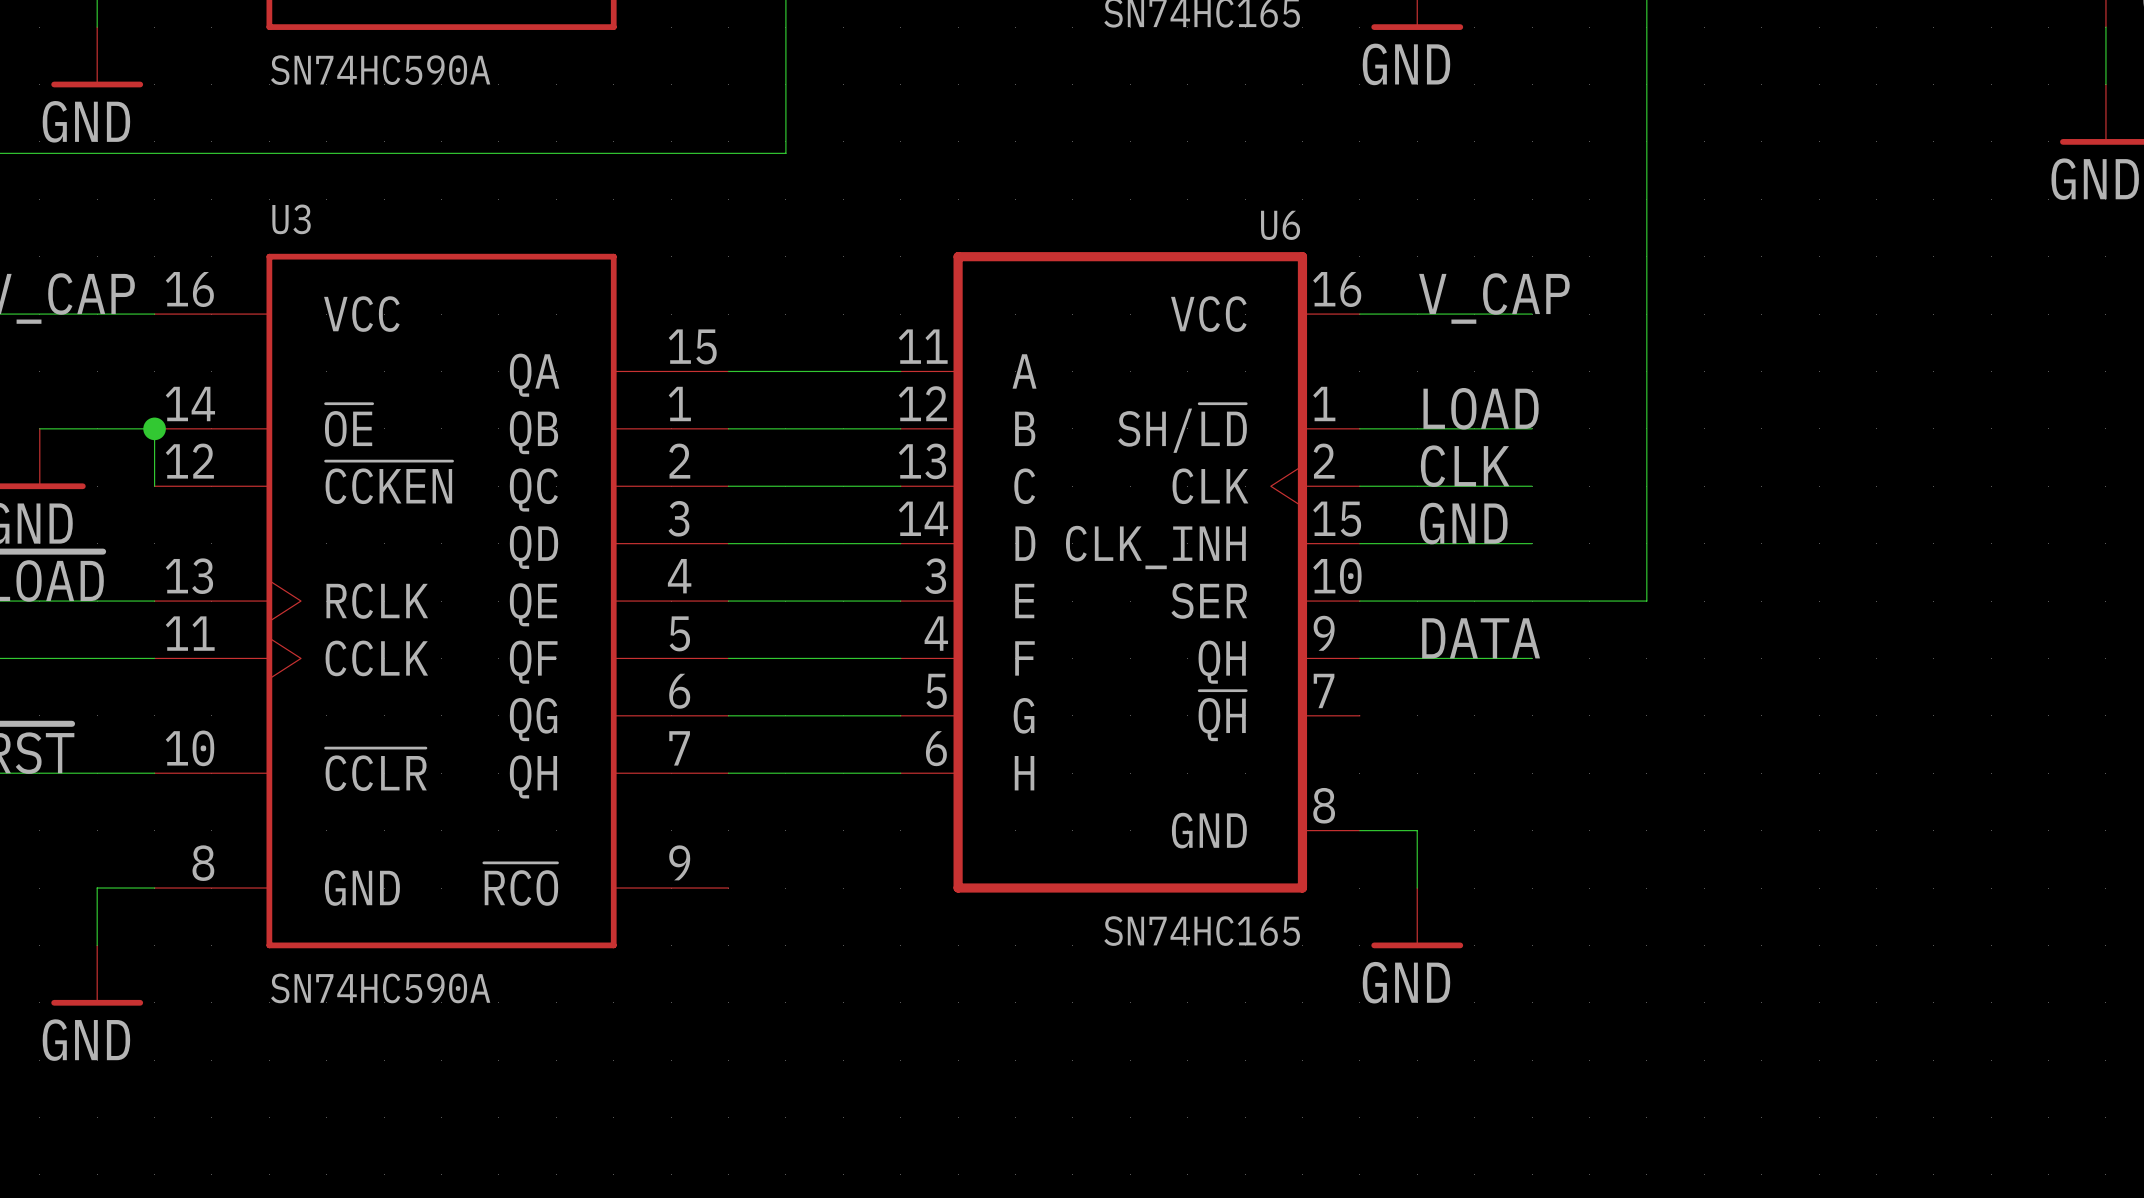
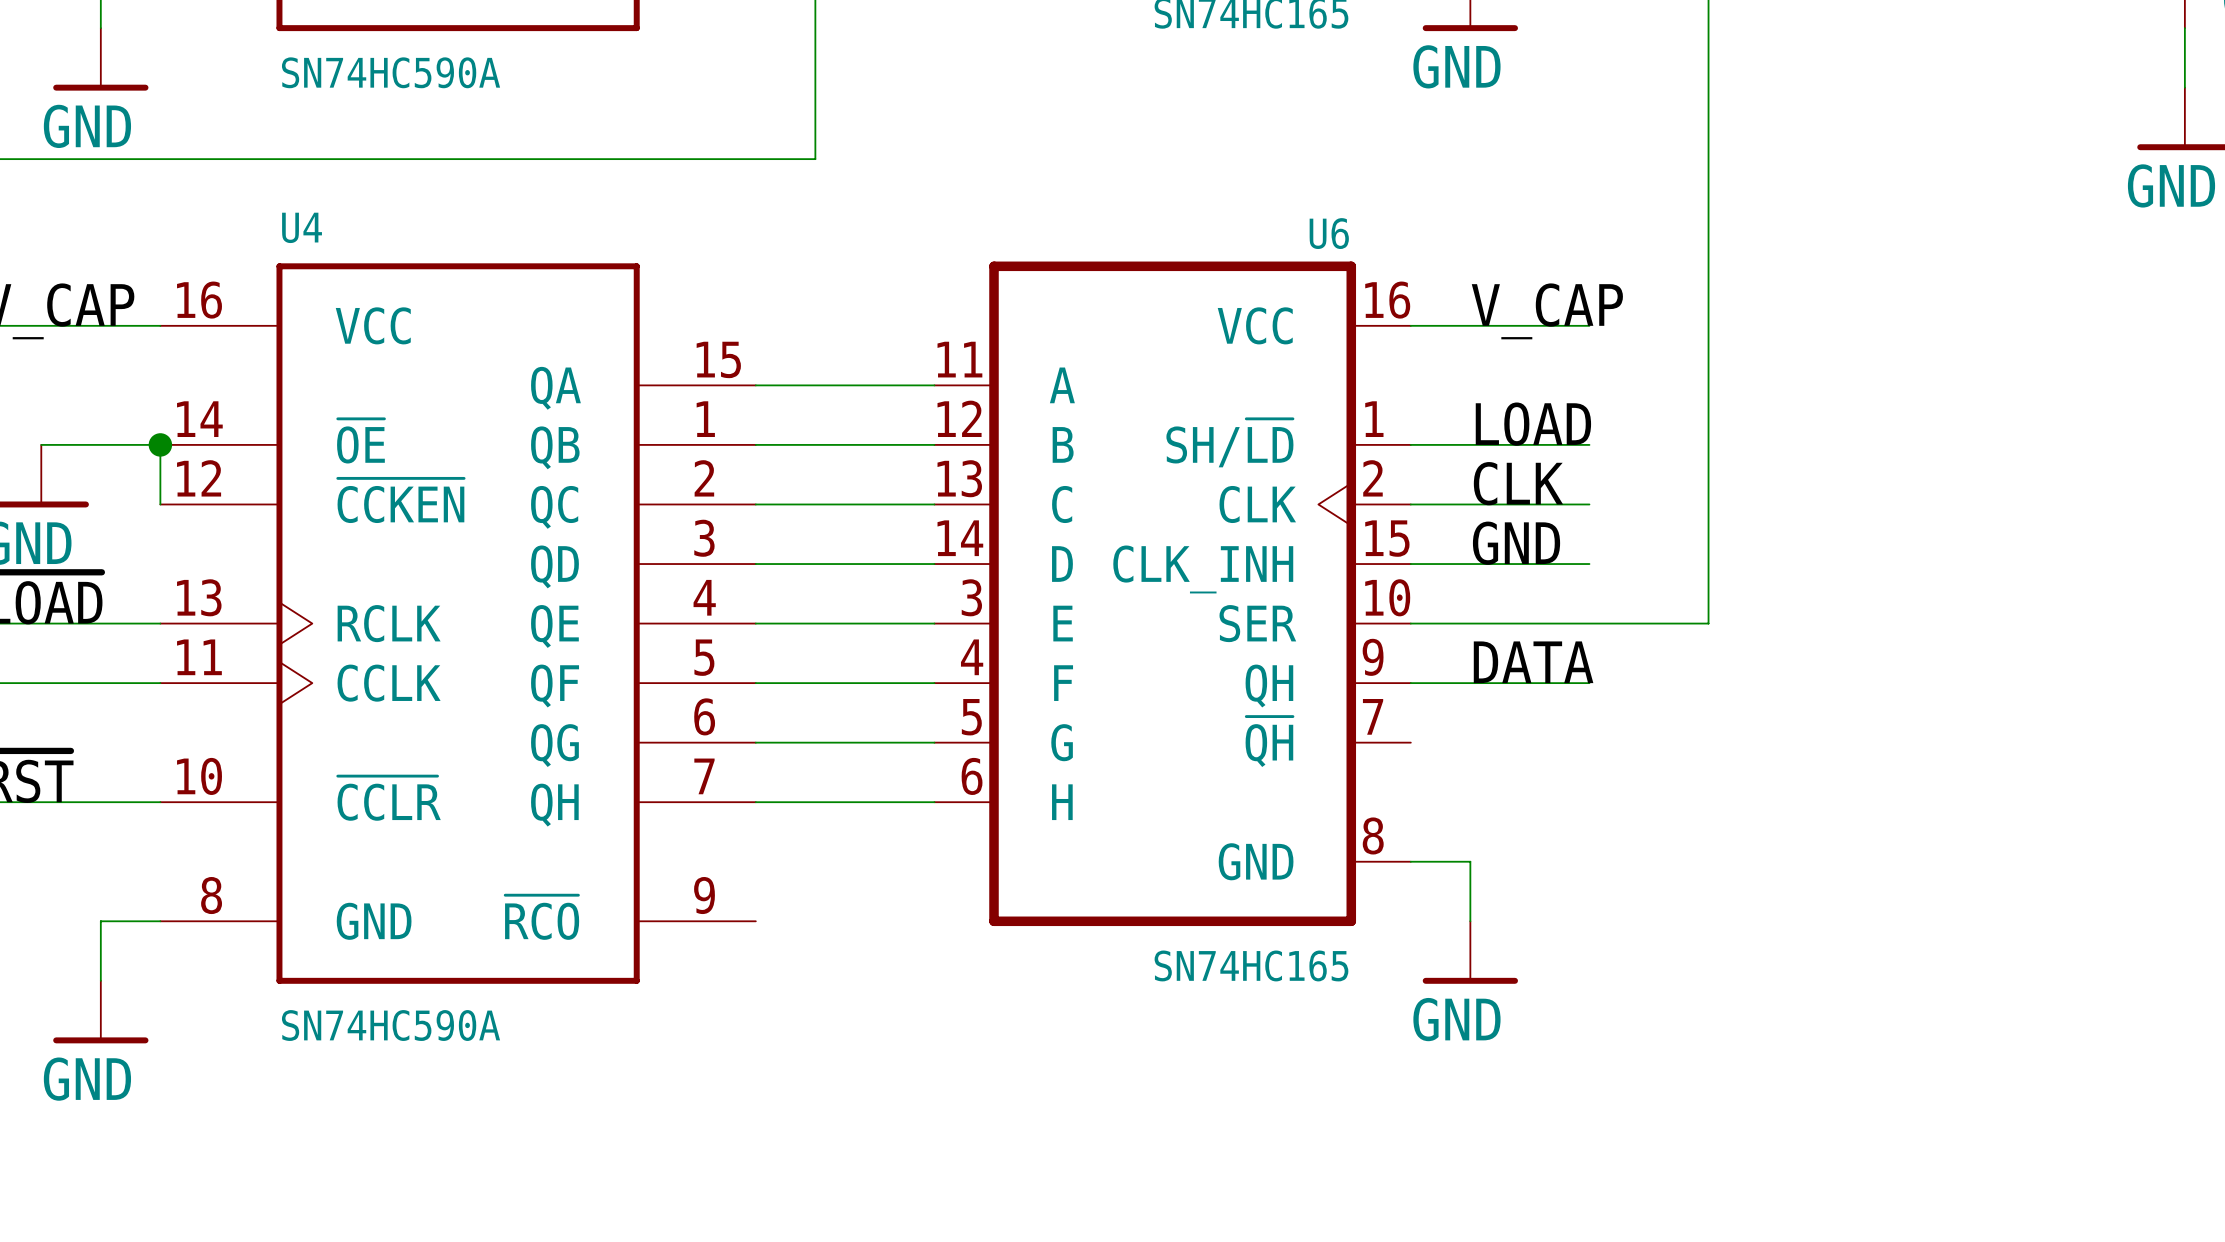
U3 name: U3 (291, 219) -> U4 (302, 227)

